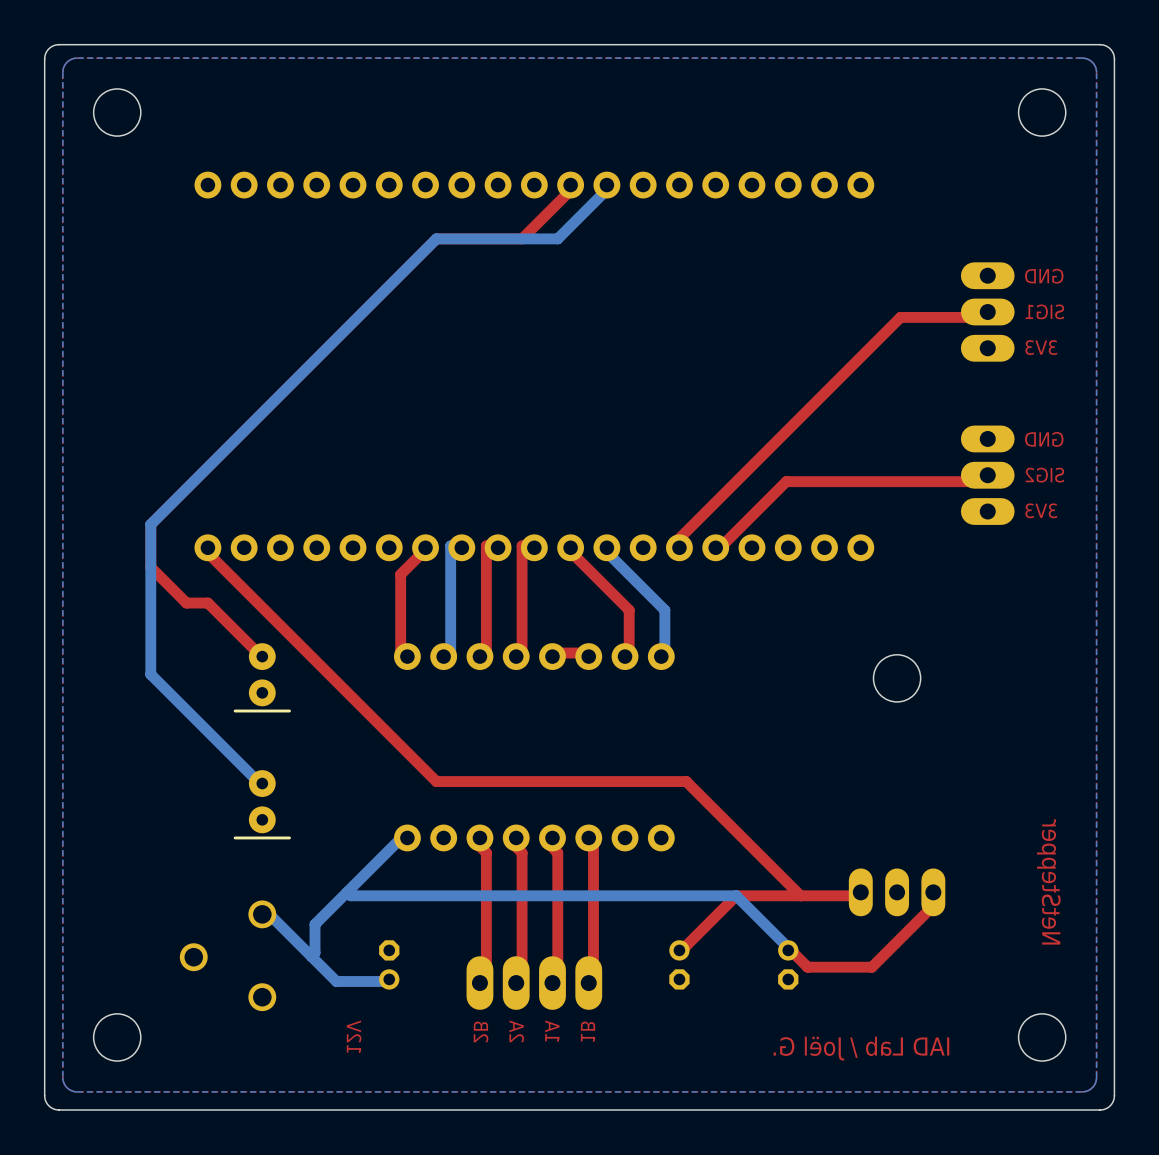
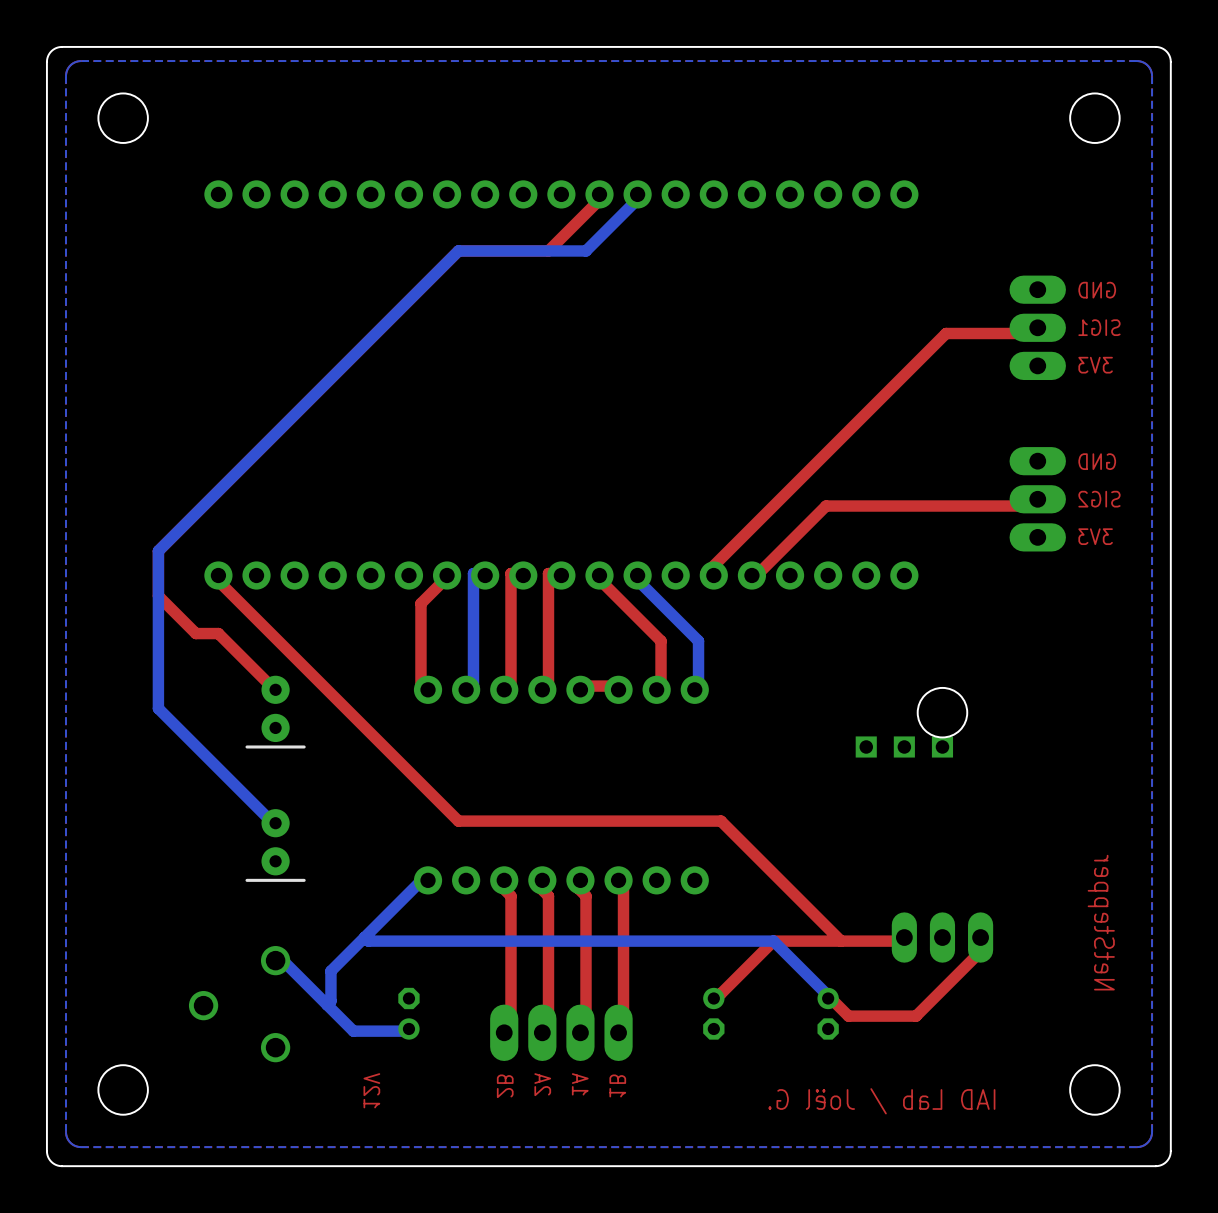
part: none -> (904, 746)

